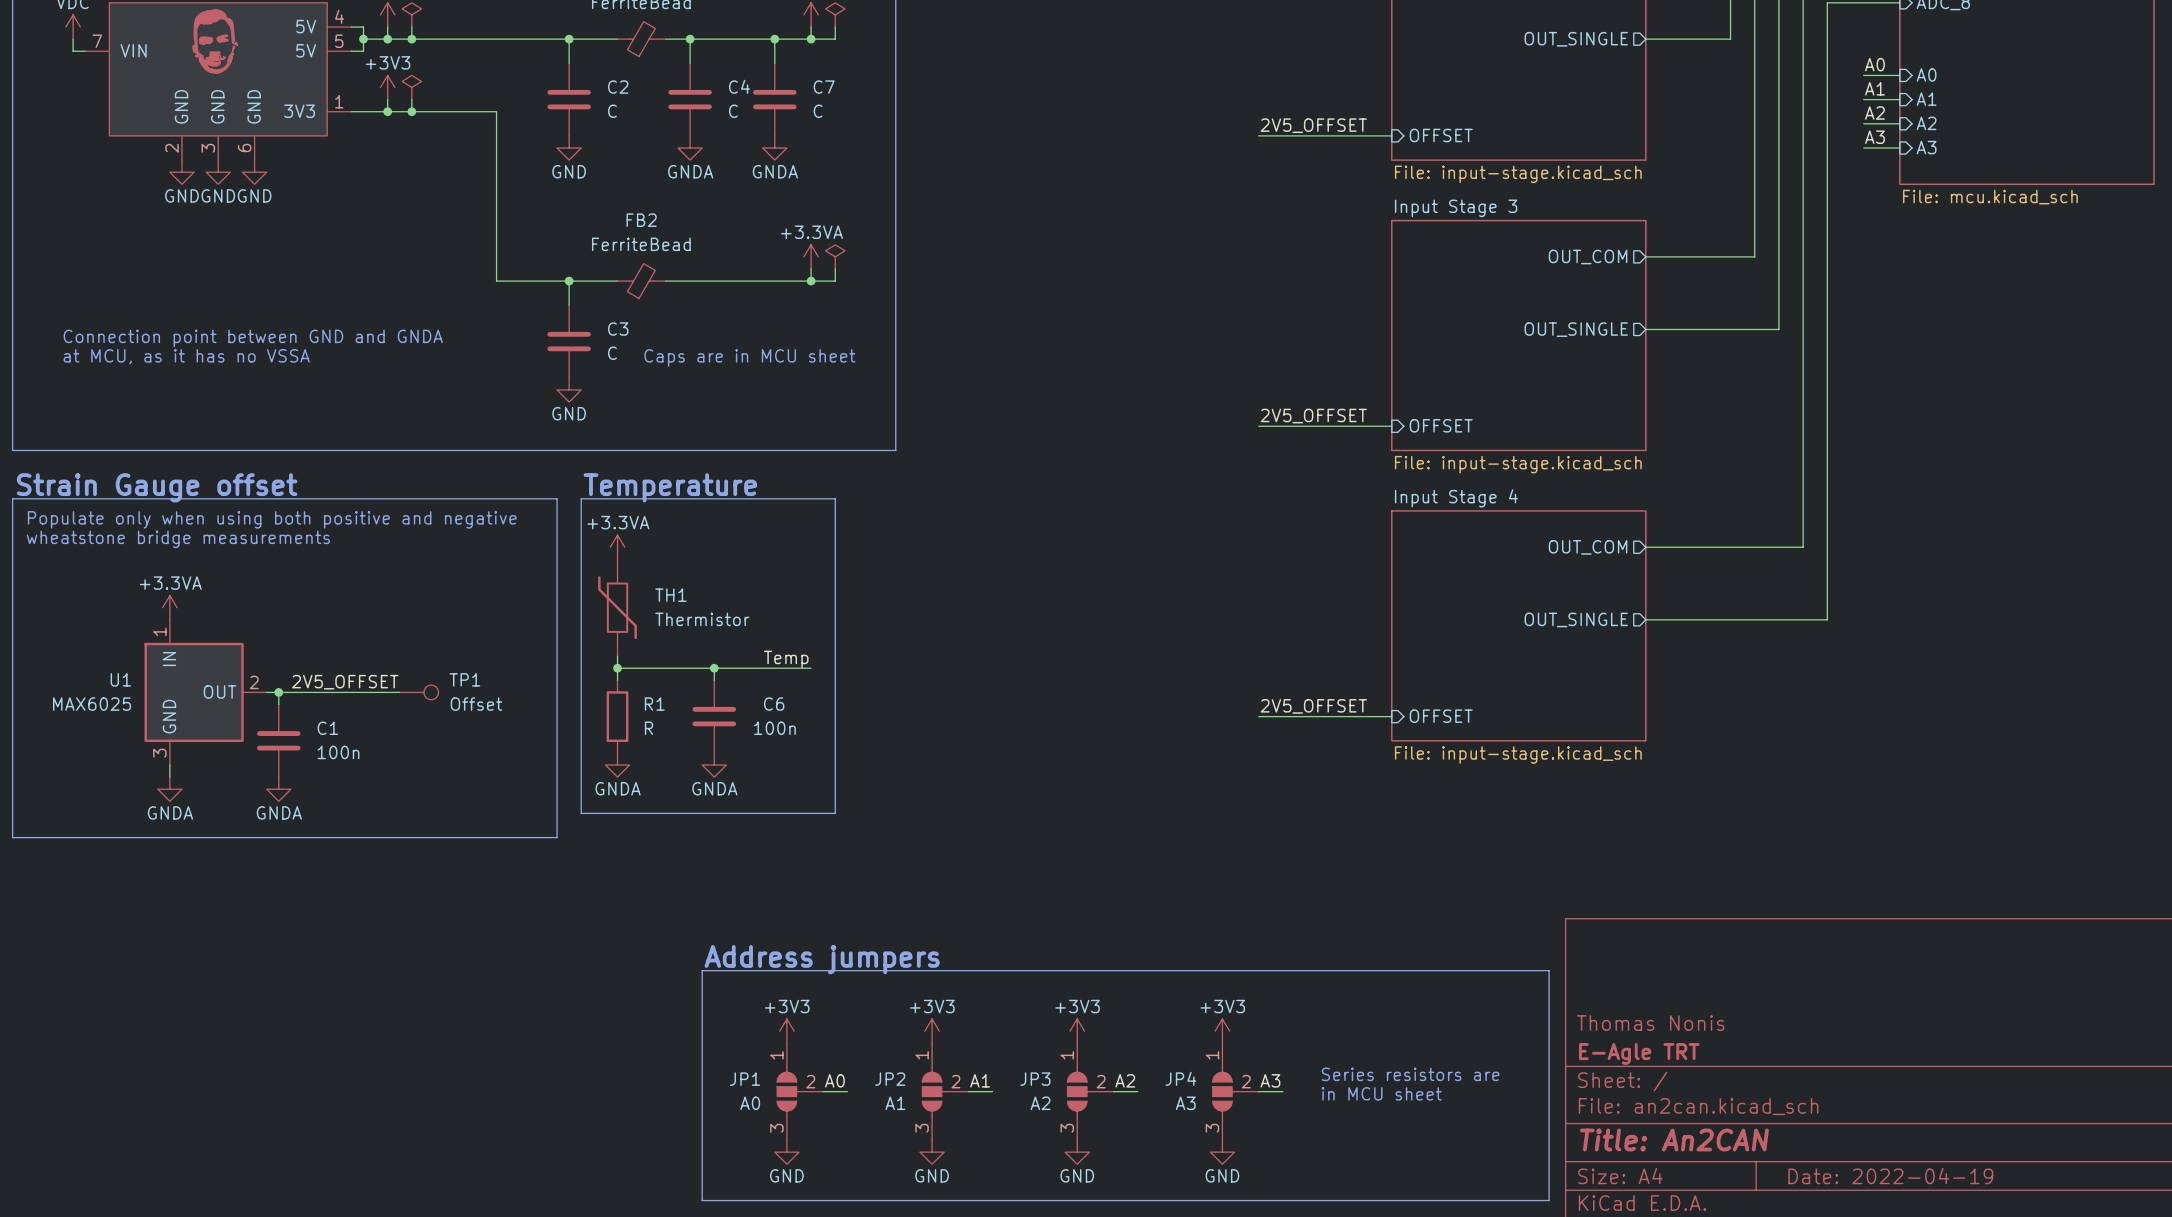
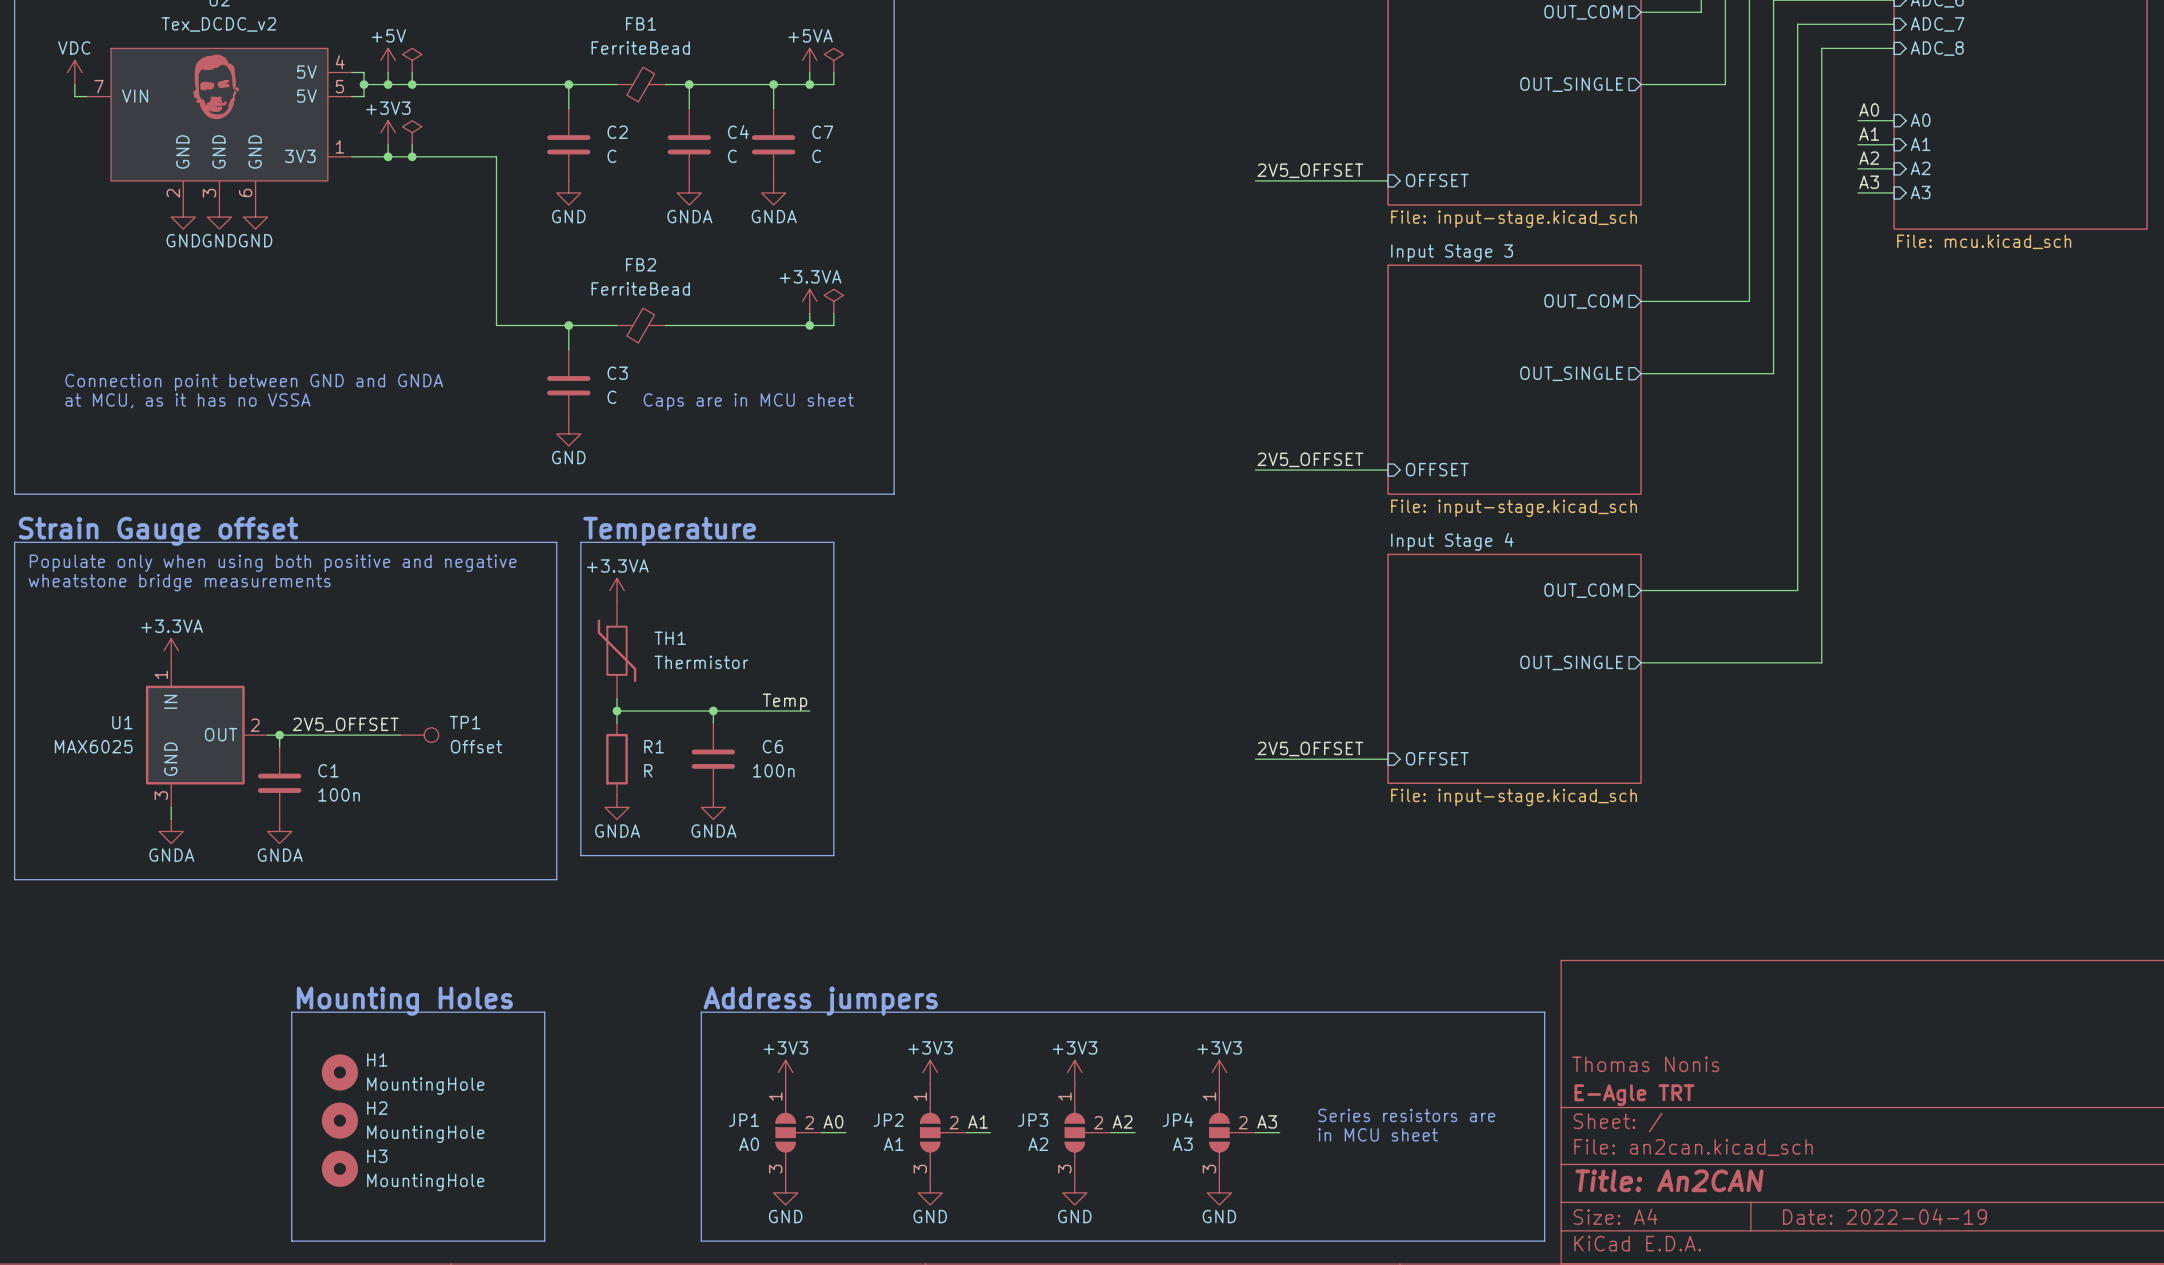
text: none -> Mounting Holes (404, 1001)
line: none -> (291, 1012) (544, 1012) (544, 1241) (291, 1241) (291, 1012)
H1: none -> MountingHole (339, 1072)
H2: none -> MountingHole (339, 1120)
H3: none -> MountingHole (339, 1168)

